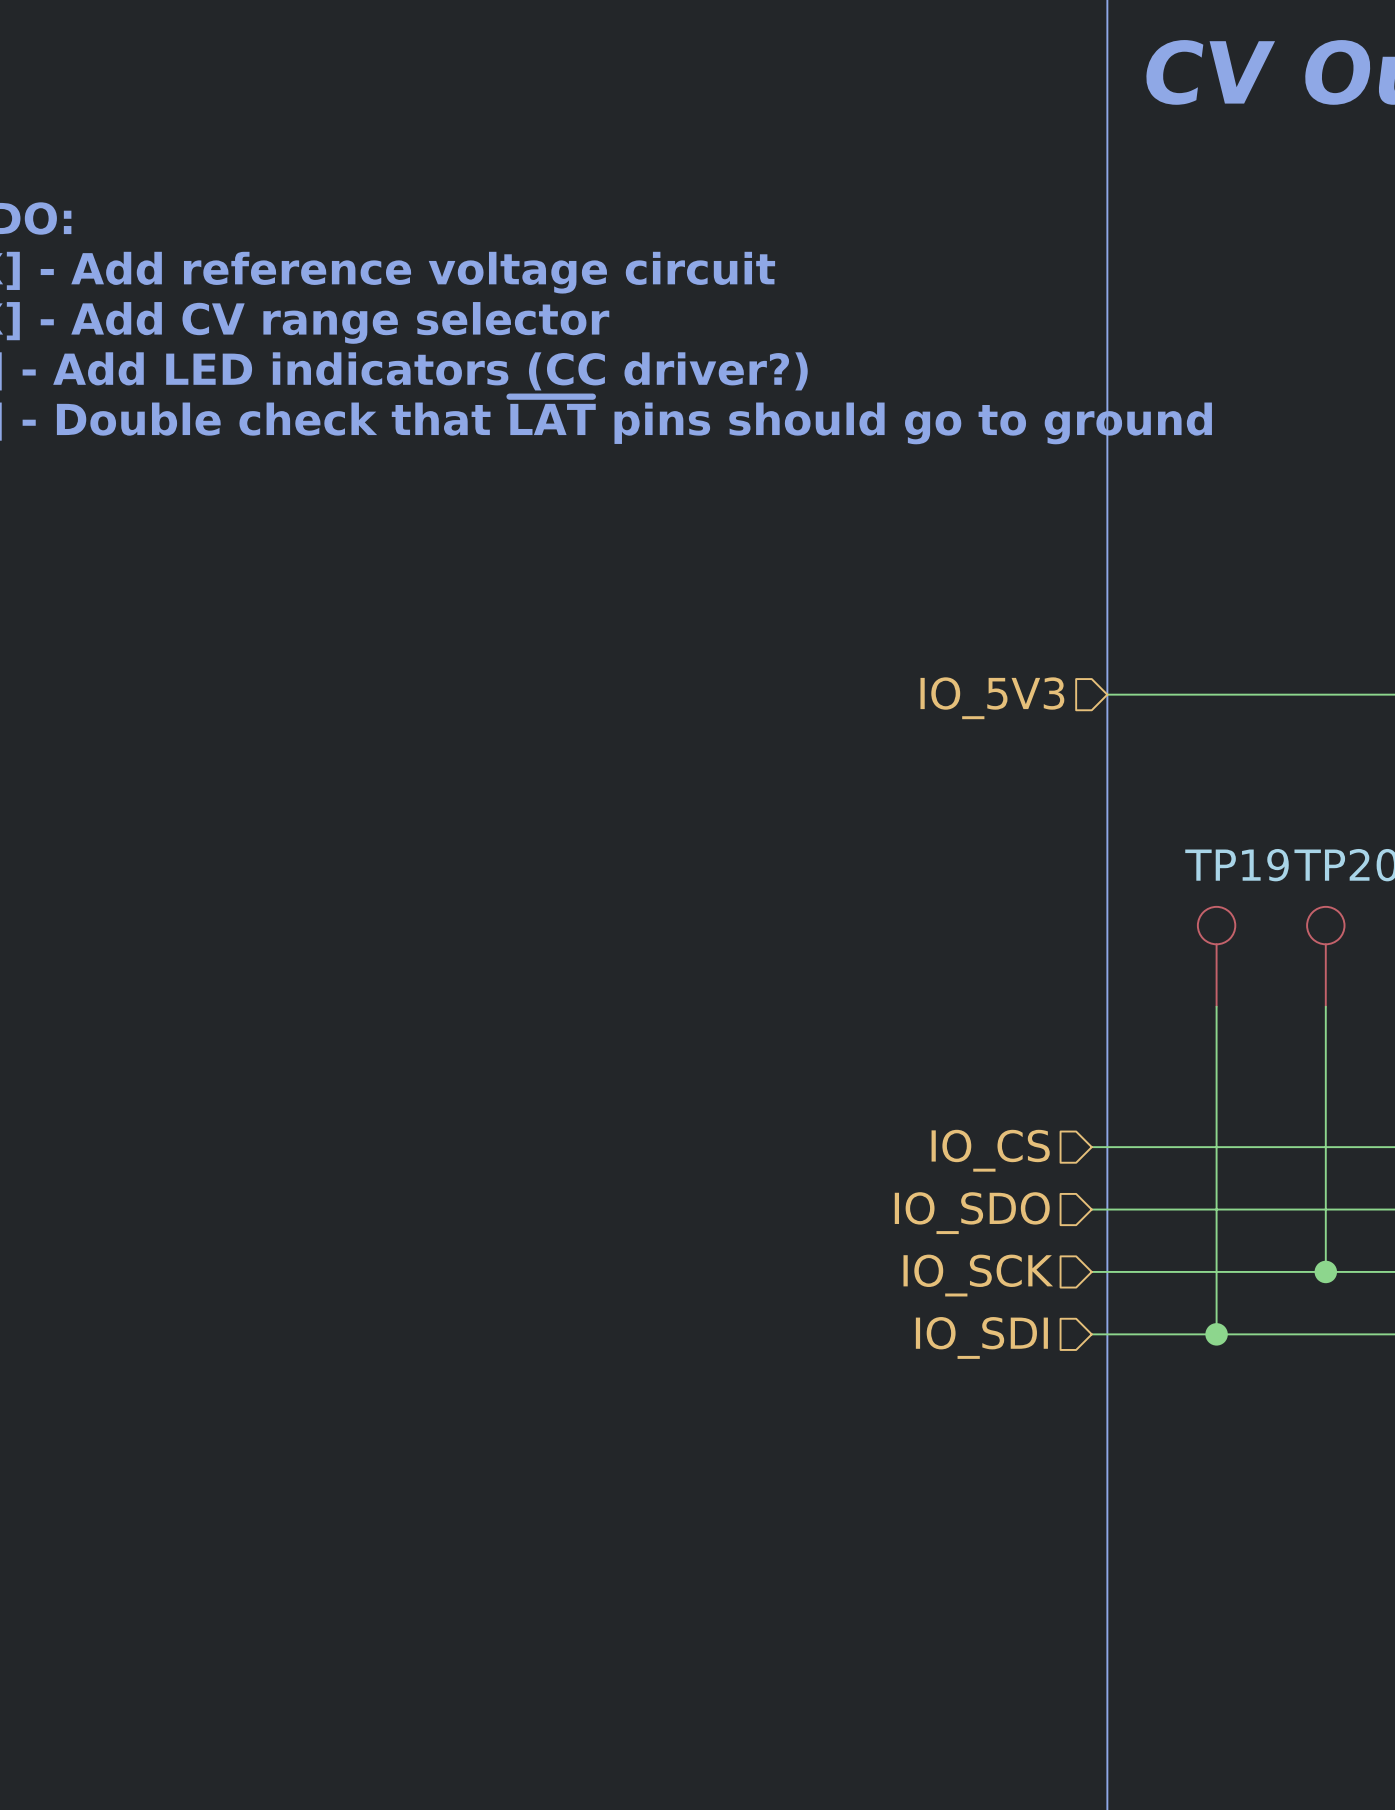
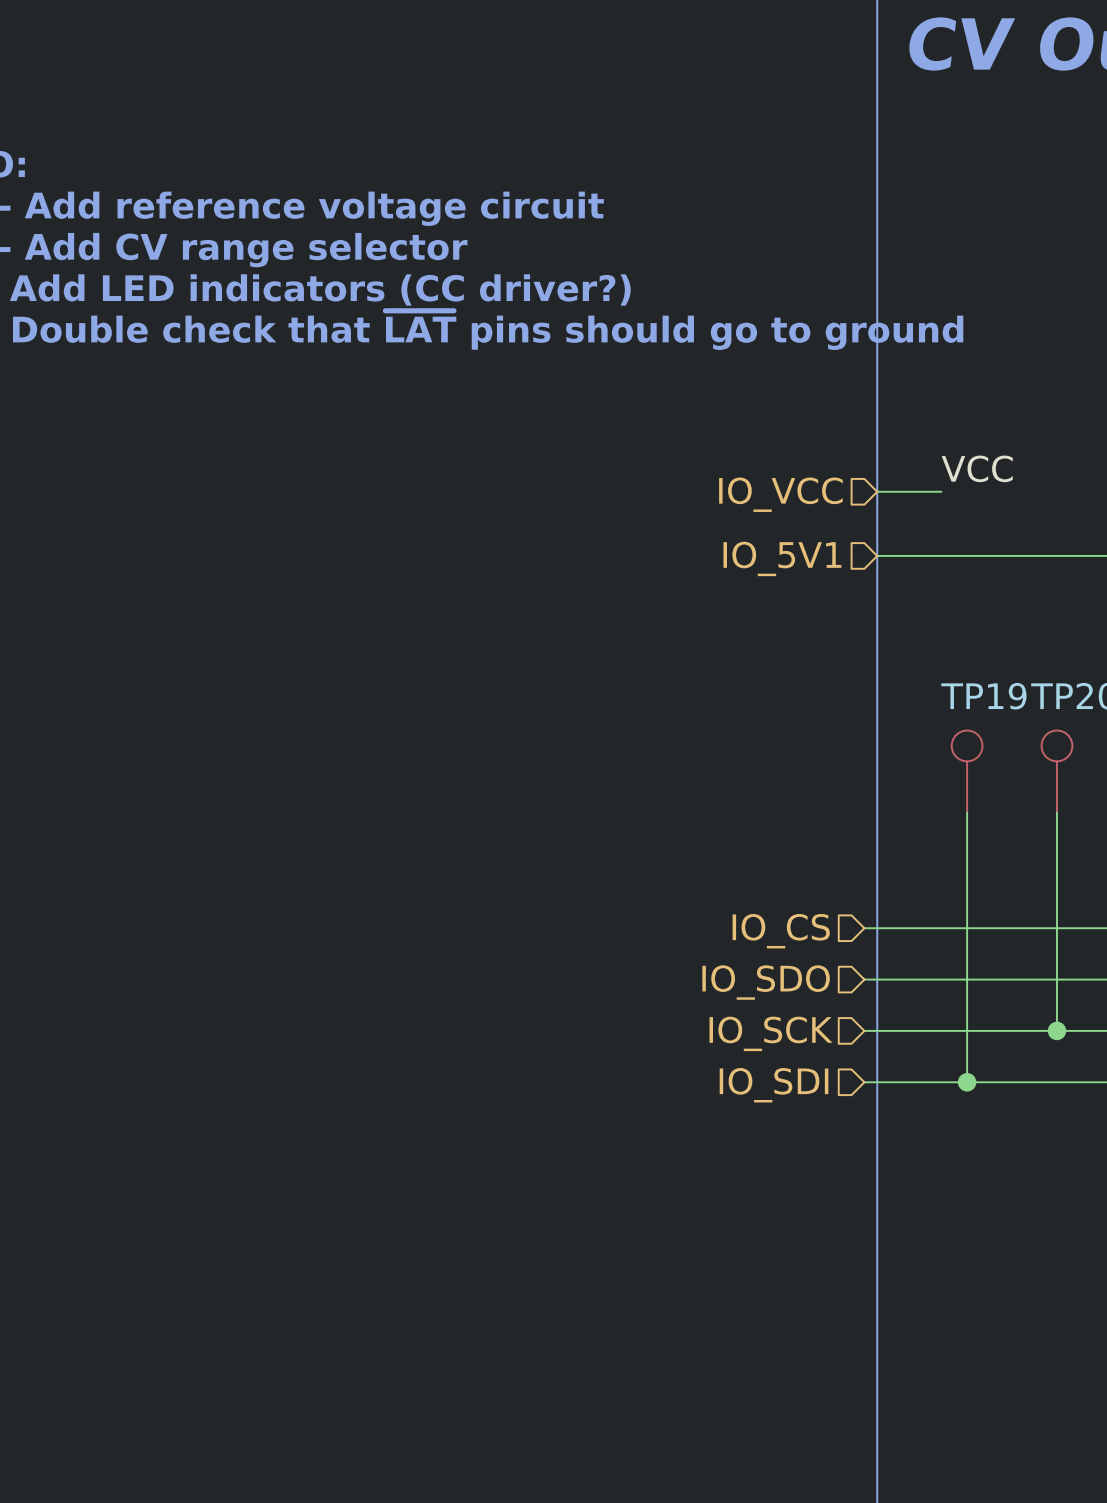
label: none -> VCC (977, 468)
wire: none -> (877, 491) (941, 491)
hierarchical label: none -> IO_VCC (780, 494)
hierarchical label: IO_5V3 (992, 698) -> IO_5V1 (782, 558)

